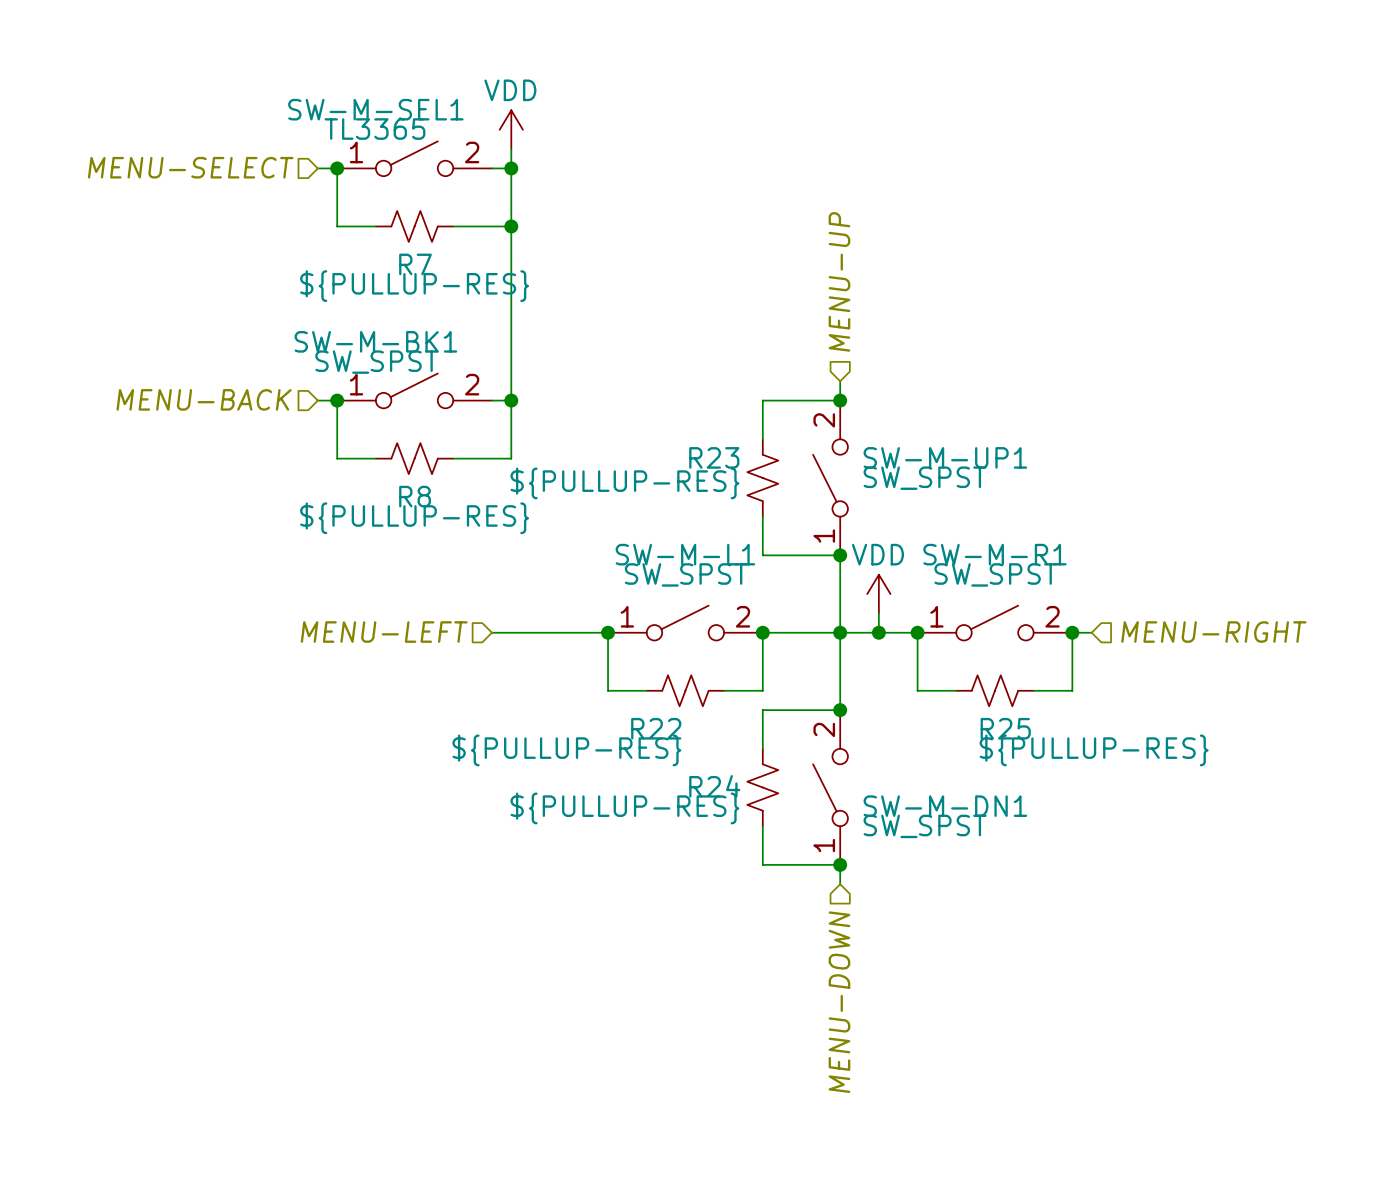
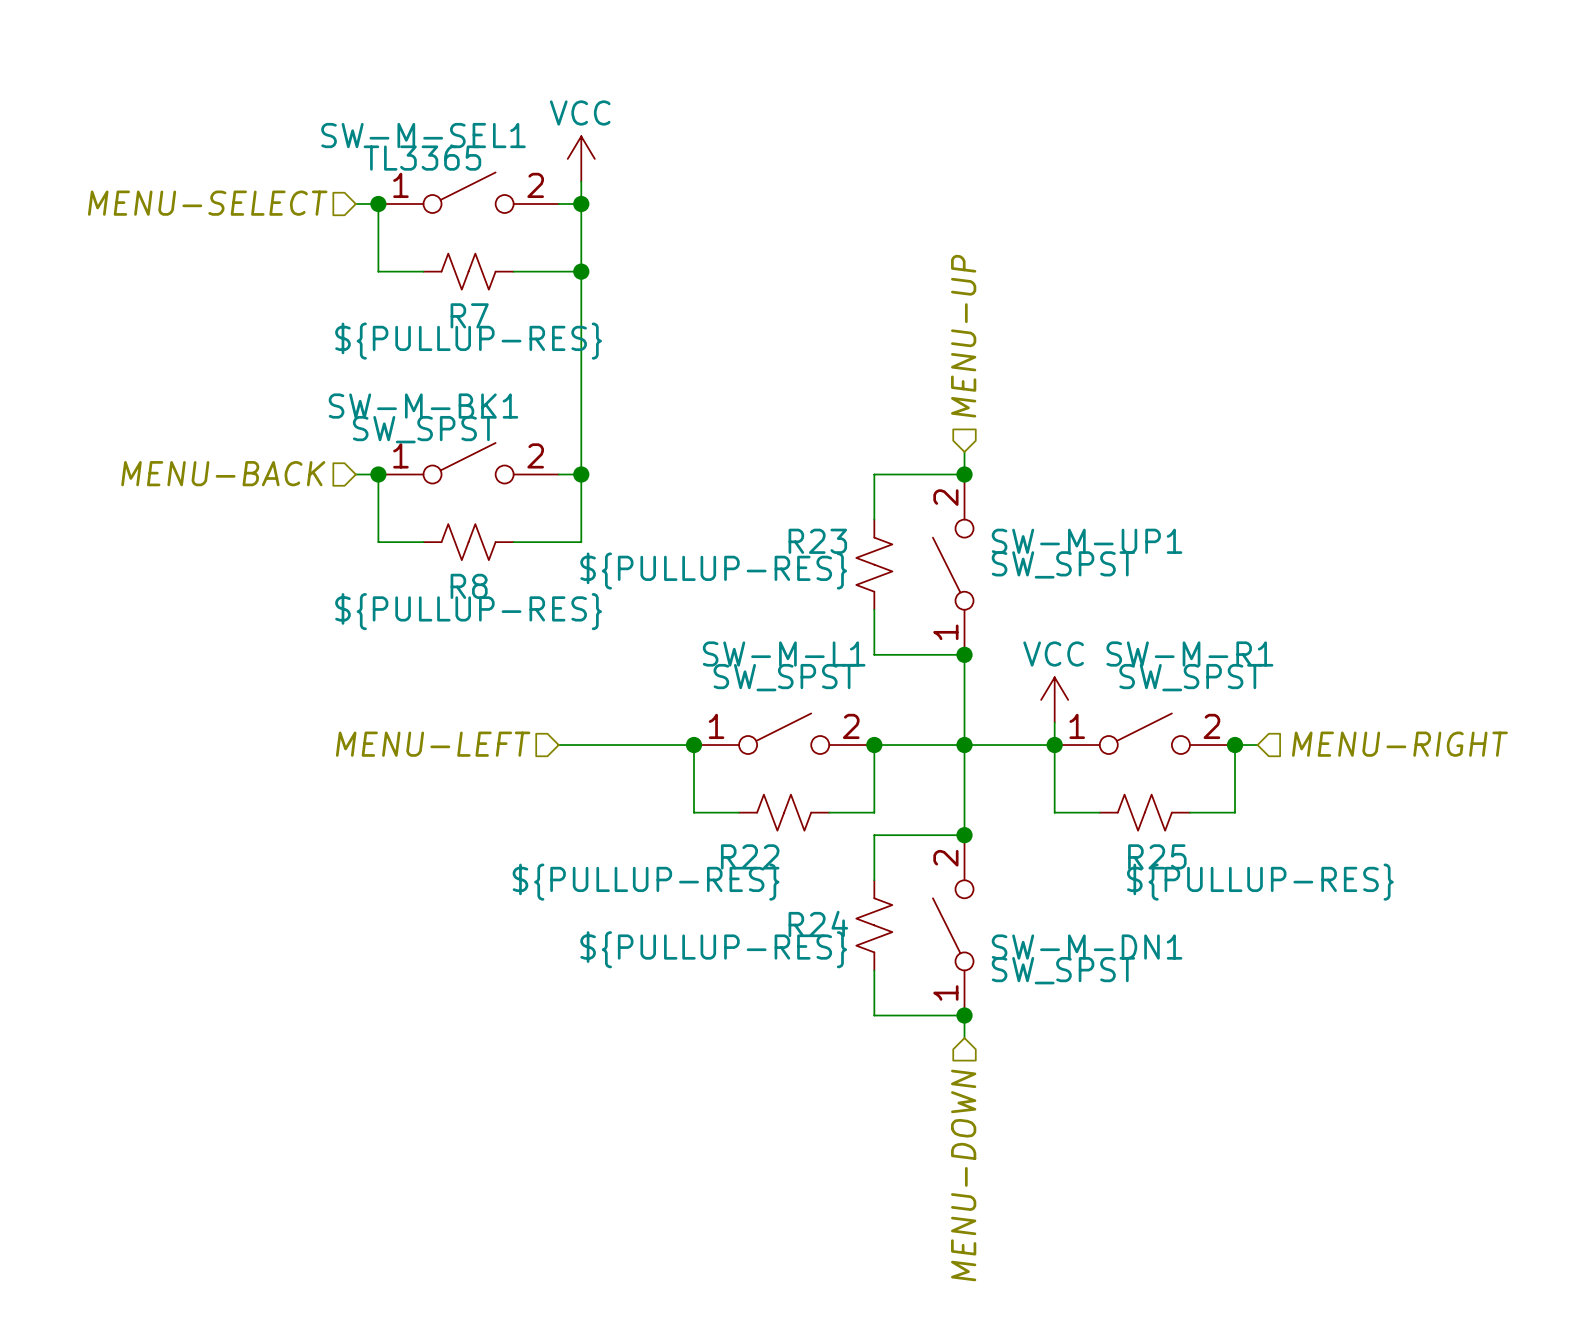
power symbol: VDD (511, 129) -> VCC (581, 158)
SW-M-R1 name position: SW-M-R1 (994, 554) -> SW-M-R1 (1189, 654)
SW-M-R1 value position: SW_SPST (995, 574) -> SW_SPST (1191, 677)
power symbol: VDD (878, 594) -> none
power symbol: none -> VCC (1054, 699)
wire: (878, 613) (878, 632) -> (1054, 722) (1054, 745)
junction: (878, 632) -> none

